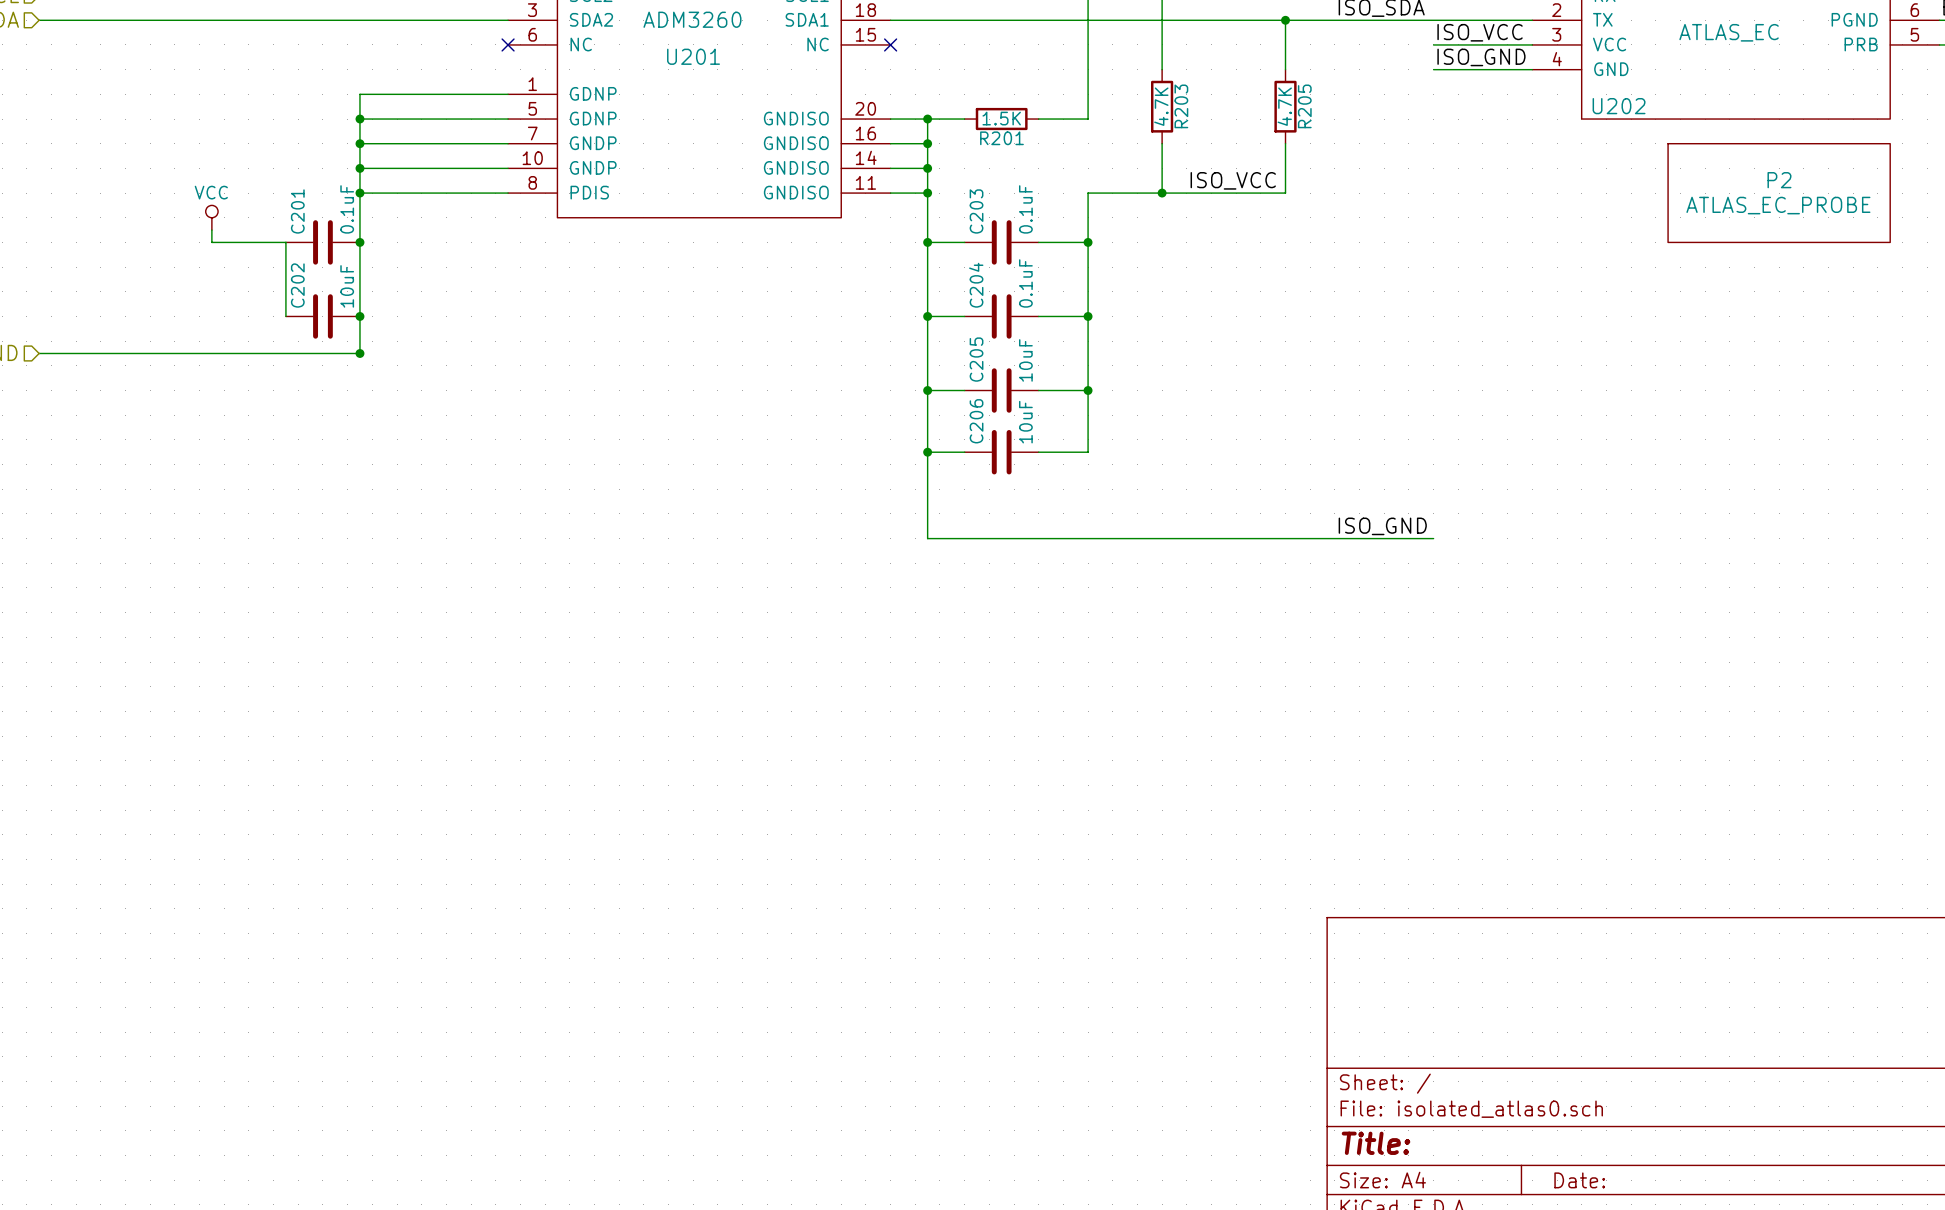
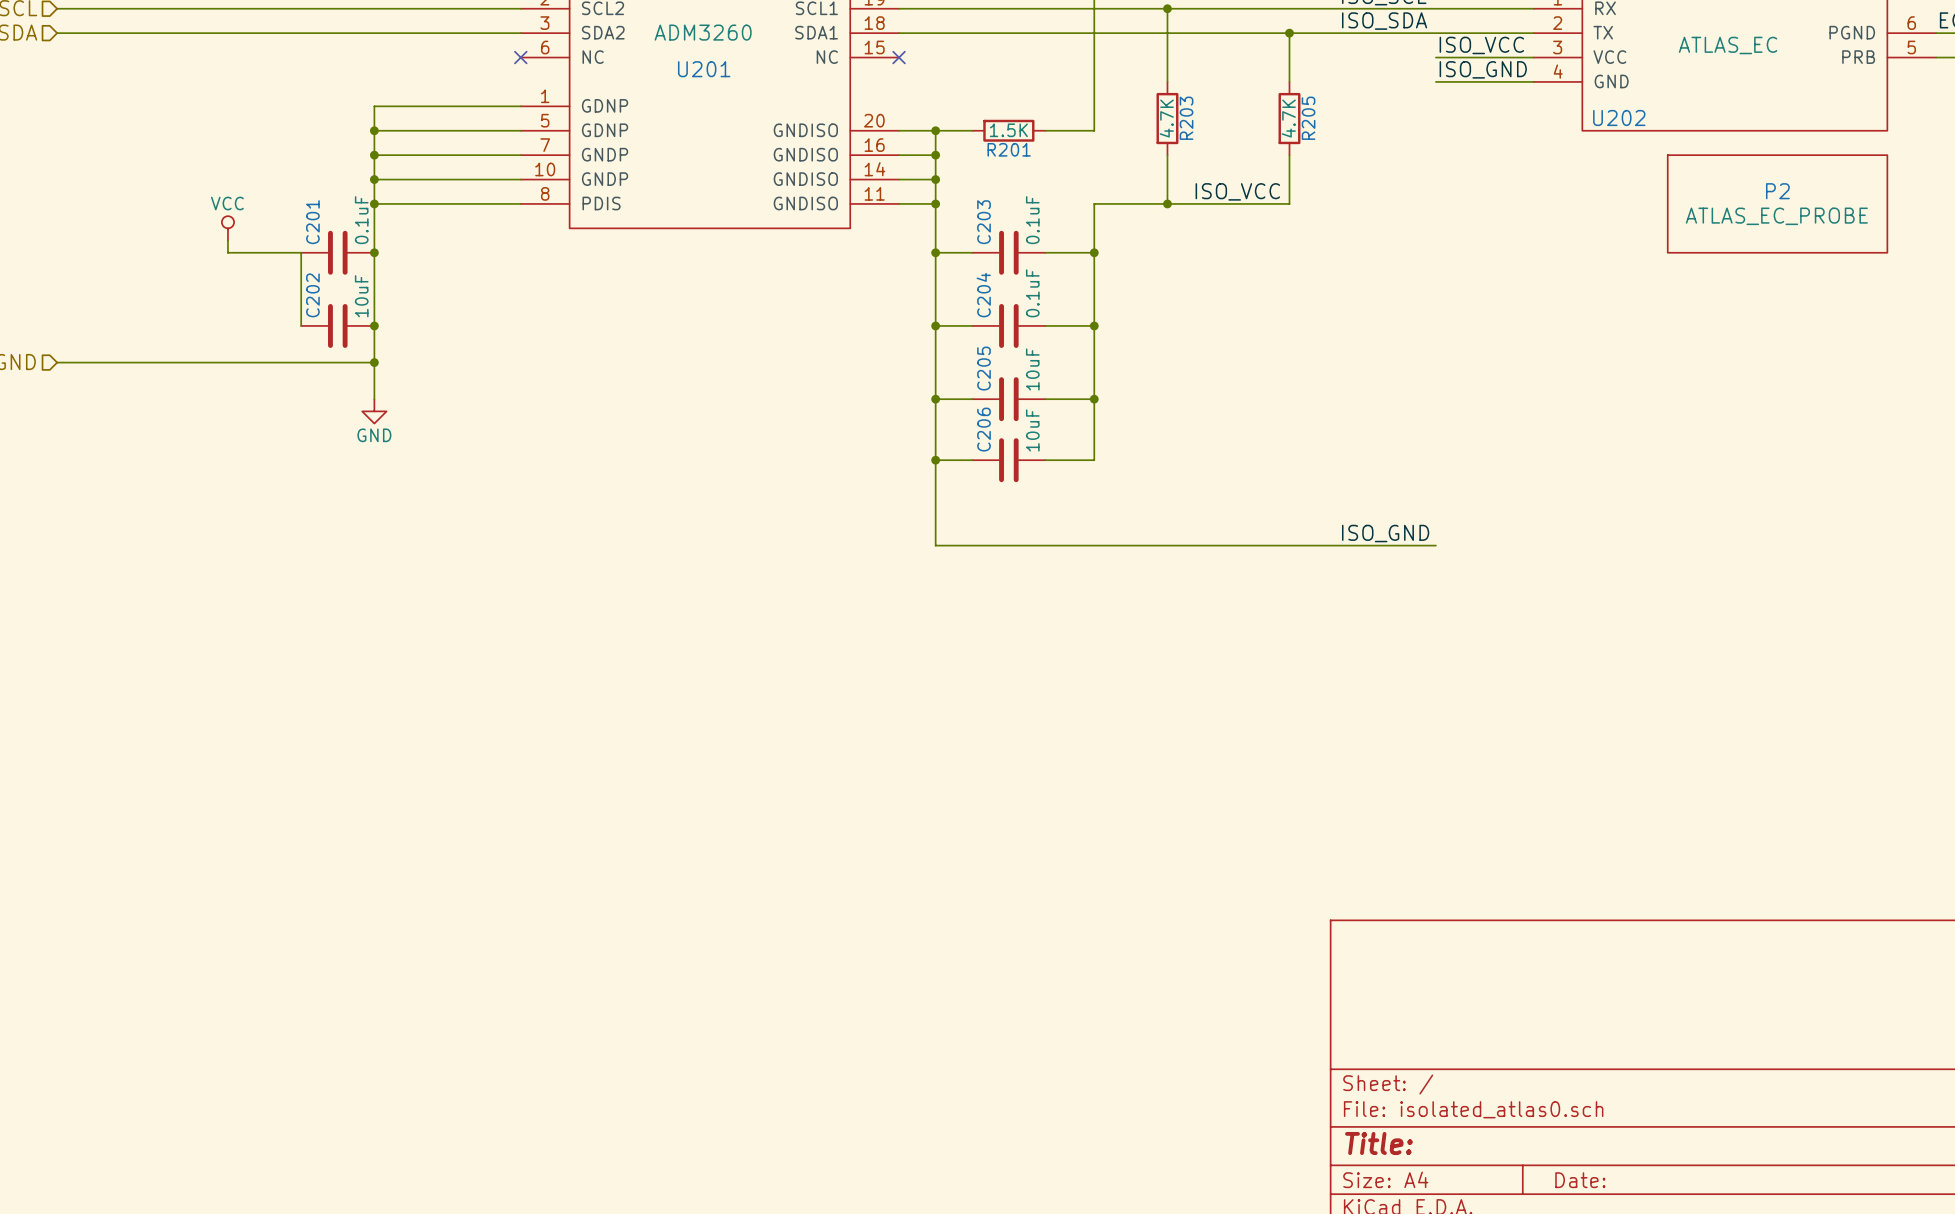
wire: none -> (374, 362) (374, 399)
power symbol: none -> GND (374, 411)

